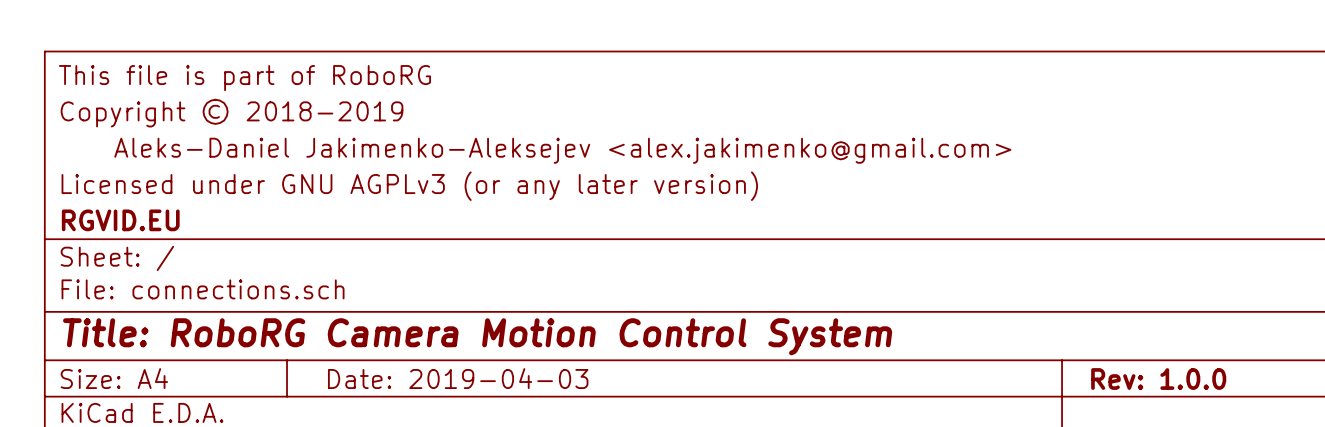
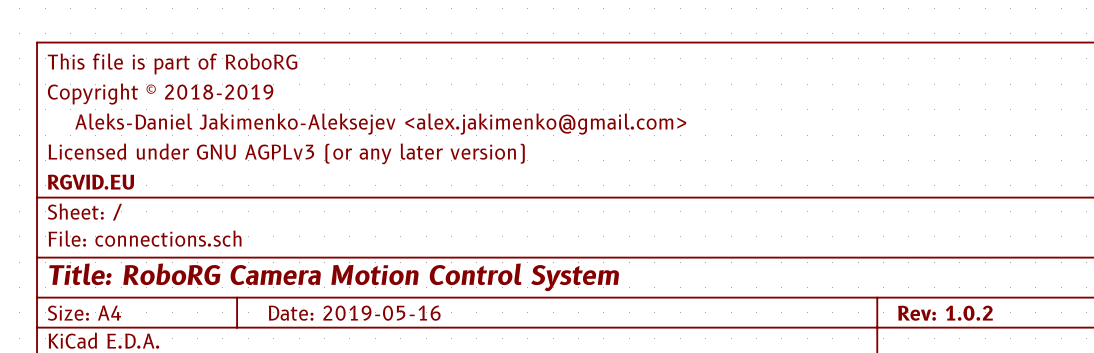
title block: Date: 2019-04-03 (458, 378) -> Date: 2019-05-16 (354, 313)
title block: Rev: 1.0.0 (1158, 379) -> Rev: 1.0.2 (945, 313)

